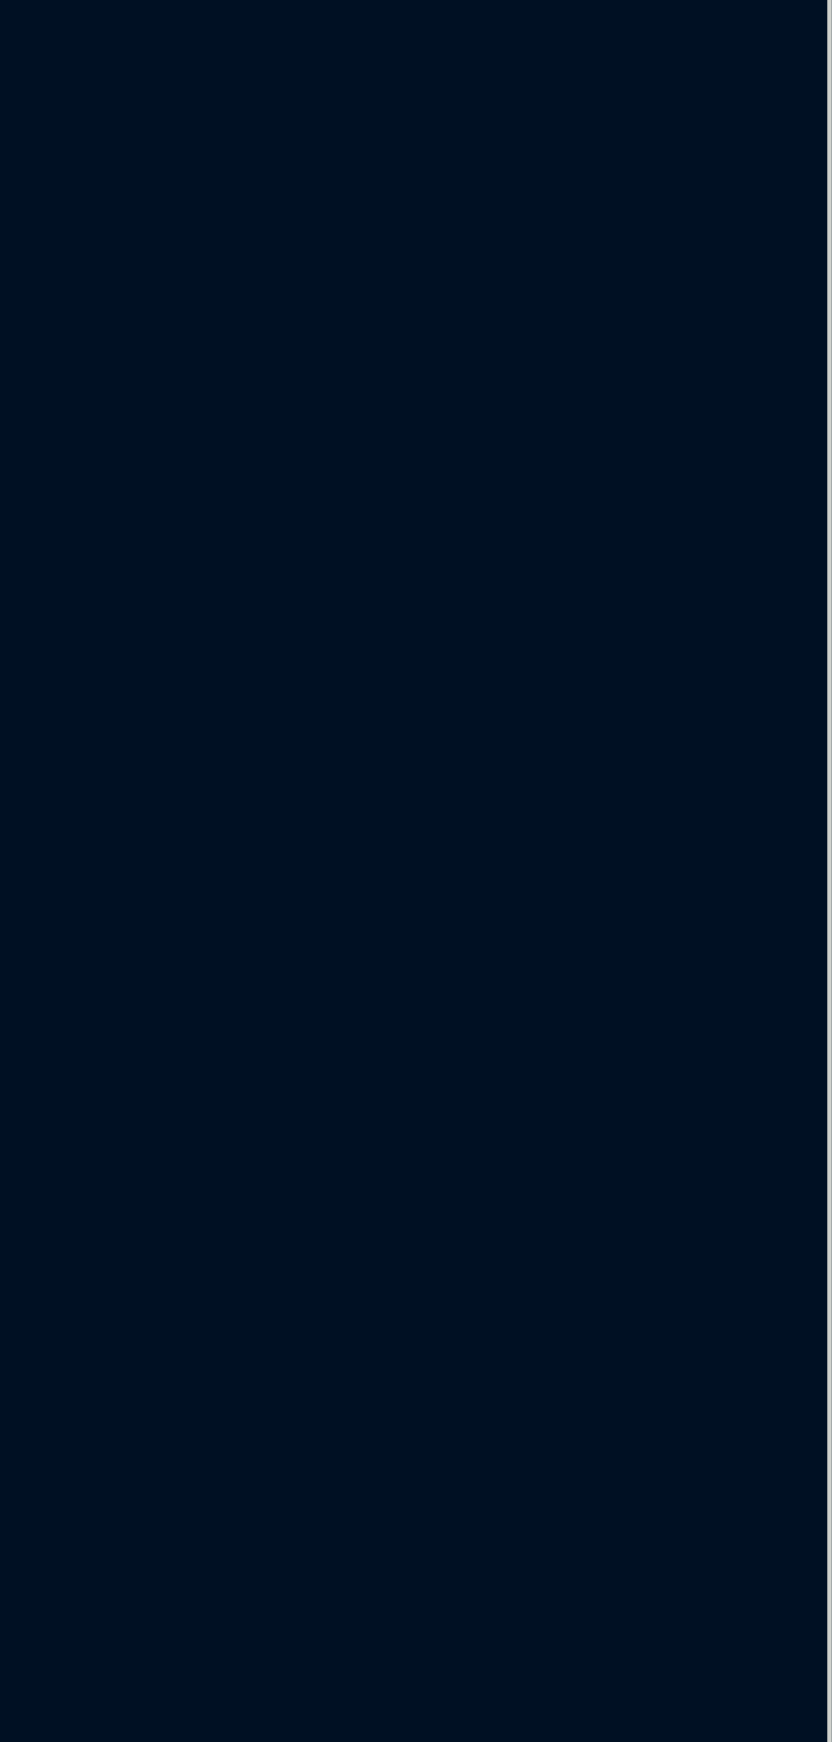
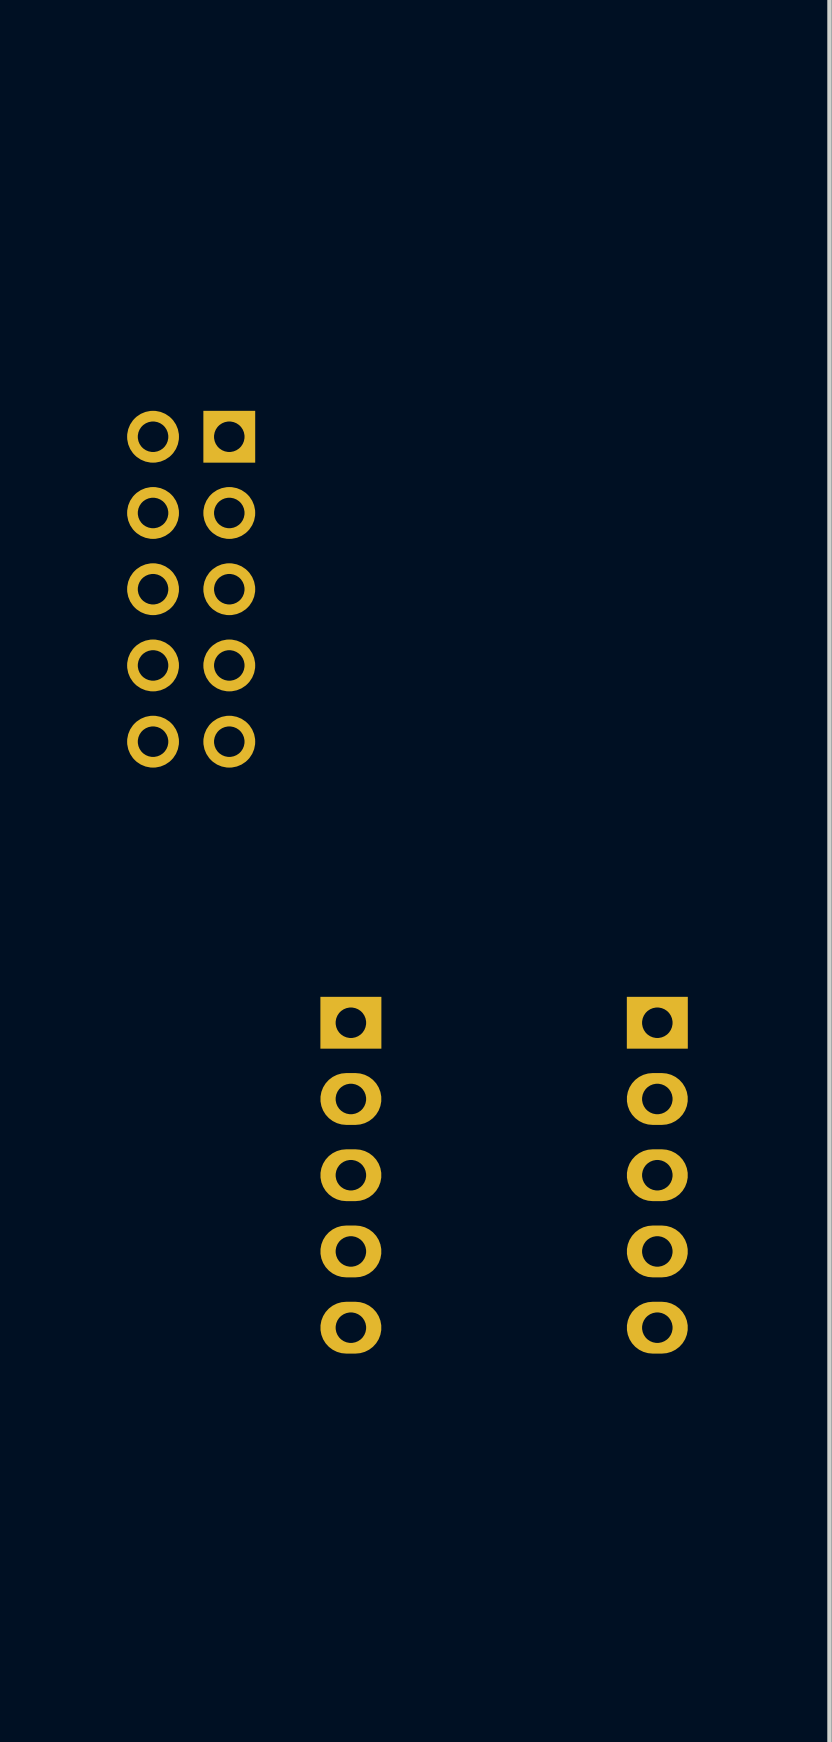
part: none -> (191, 589)
part: none -> (350, 1175)
part: none -> (657, 1175)

